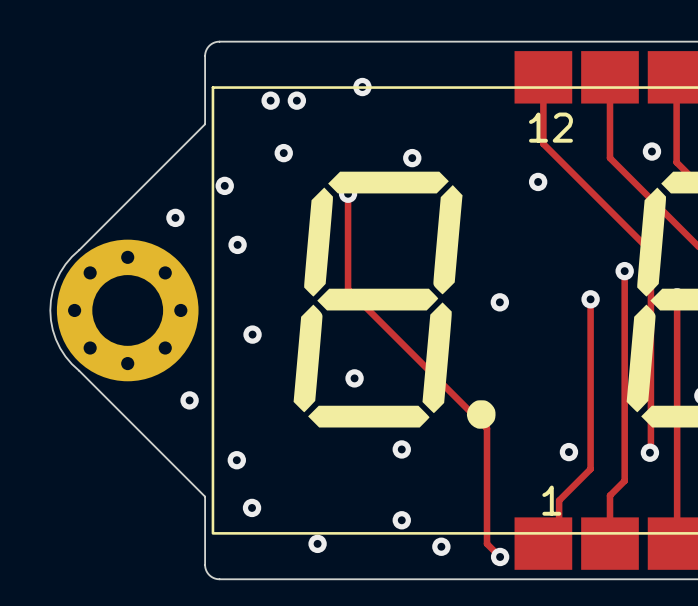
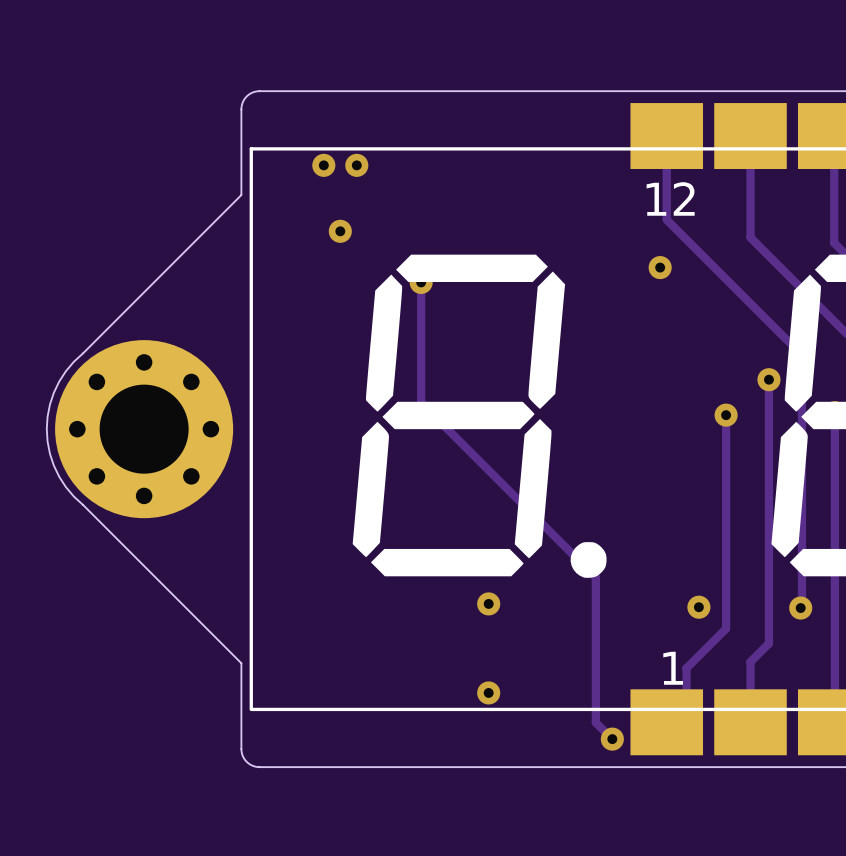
via: (362, 87) -> none
via: (651, 151) -> none
via: (412, 158) -> none
via: (224, 185) -> none
via: (175, 217) -> none
via: (237, 244) -> none
via: (499, 302) -> none
via: (252, 334) -> none
via: (354, 378) -> none
via: (189, 400) -> none
via: (236, 460) -> none
via: (252, 507) -> none
via: (317, 543) -> none
via: (441, 546) -> none

